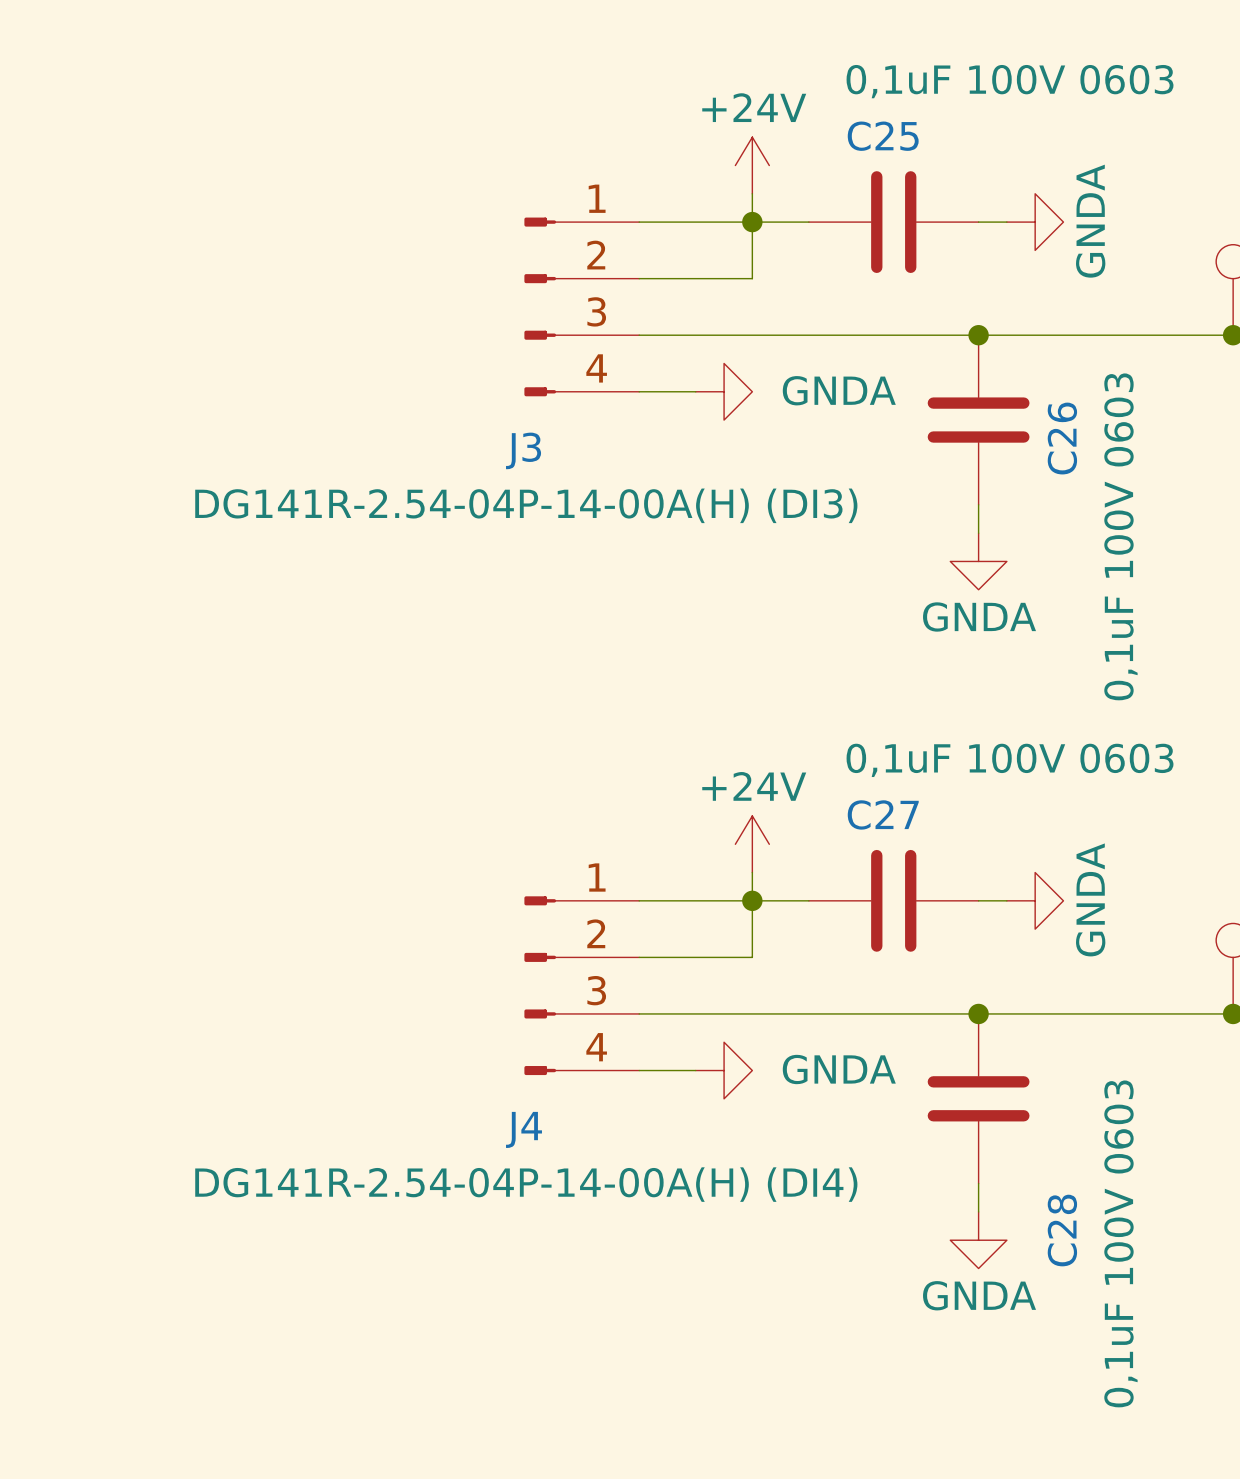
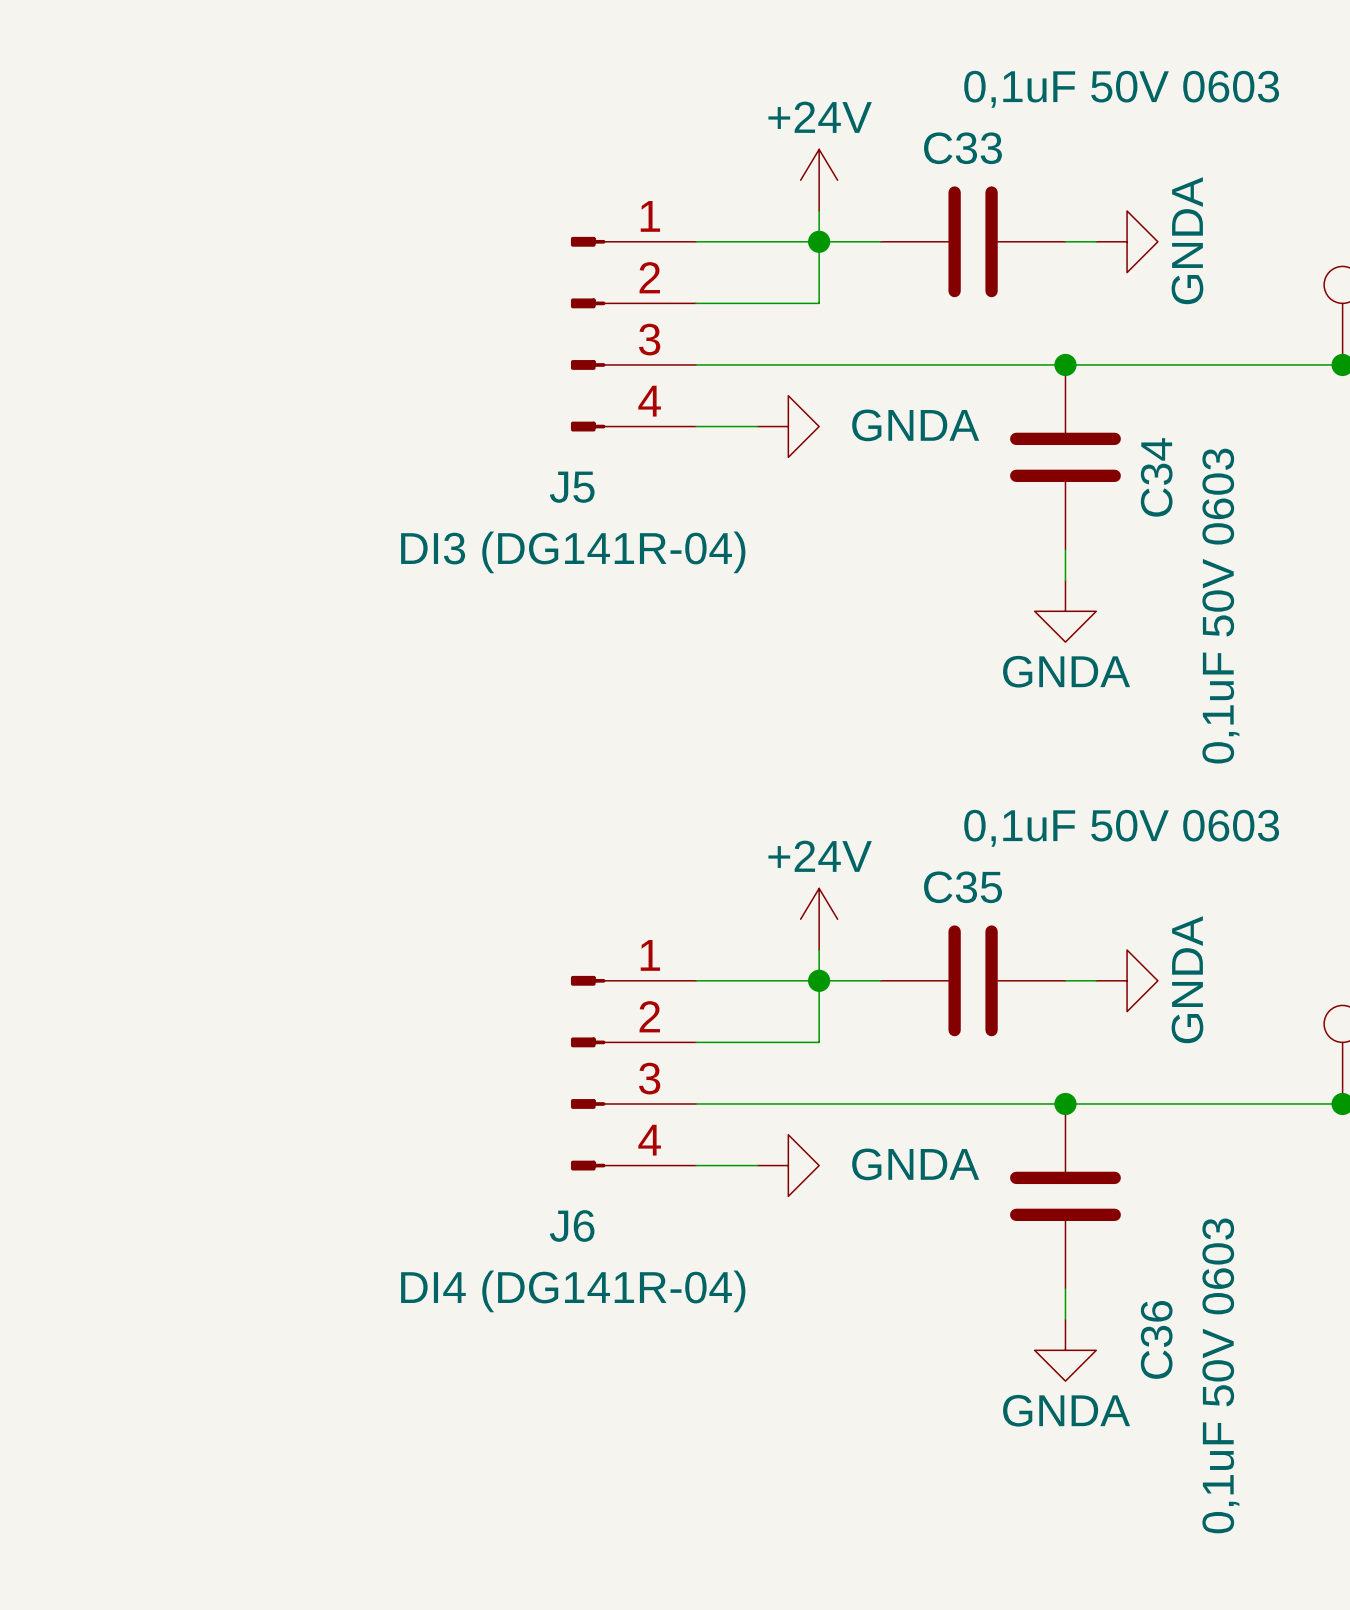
C25 value: 0,1uF 100V 0603 (1010, 81) -> 0,1uF 50V 0603 (1121, 89)
C25 name: C25 (883, 136) -> C33 (962, 148)
C26 name: C26 (1062, 438) -> C34 (1156, 477)
J3 name: J3 (523, 450) -> J5 (572, 487)
J3 value: DG141R-2.54-04P-14-00A(H) (DI3) (526, 505) -> DI3 (DG141R-04) (573, 552)
C26 value: 0,1uF 100V 0603 (1120, 536) -> 0,1uF 50V 0603 (1220, 606)
C27 value: 0,1uF 100V 0603 (1010, 760) -> 0,1uF 50V 0603 (1121, 828)
C27 name: C27 (883, 814) -> C35 (963, 887)
J4 name: J4 (523, 1129) -> J6 (572, 1225)
J4 value: DG141R-2.54-04P-14-00A(H) (DI4) (526, 1184) -> DI4 (DG141R-04) (573, 1291)
C28 name: C28 (1062, 1230) -> C36 (1156, 1339)
C28 value: 0,1uF 100V 0603 (1120, 1243) -> 0,1uF 50V 0603 (1220, 1375)

